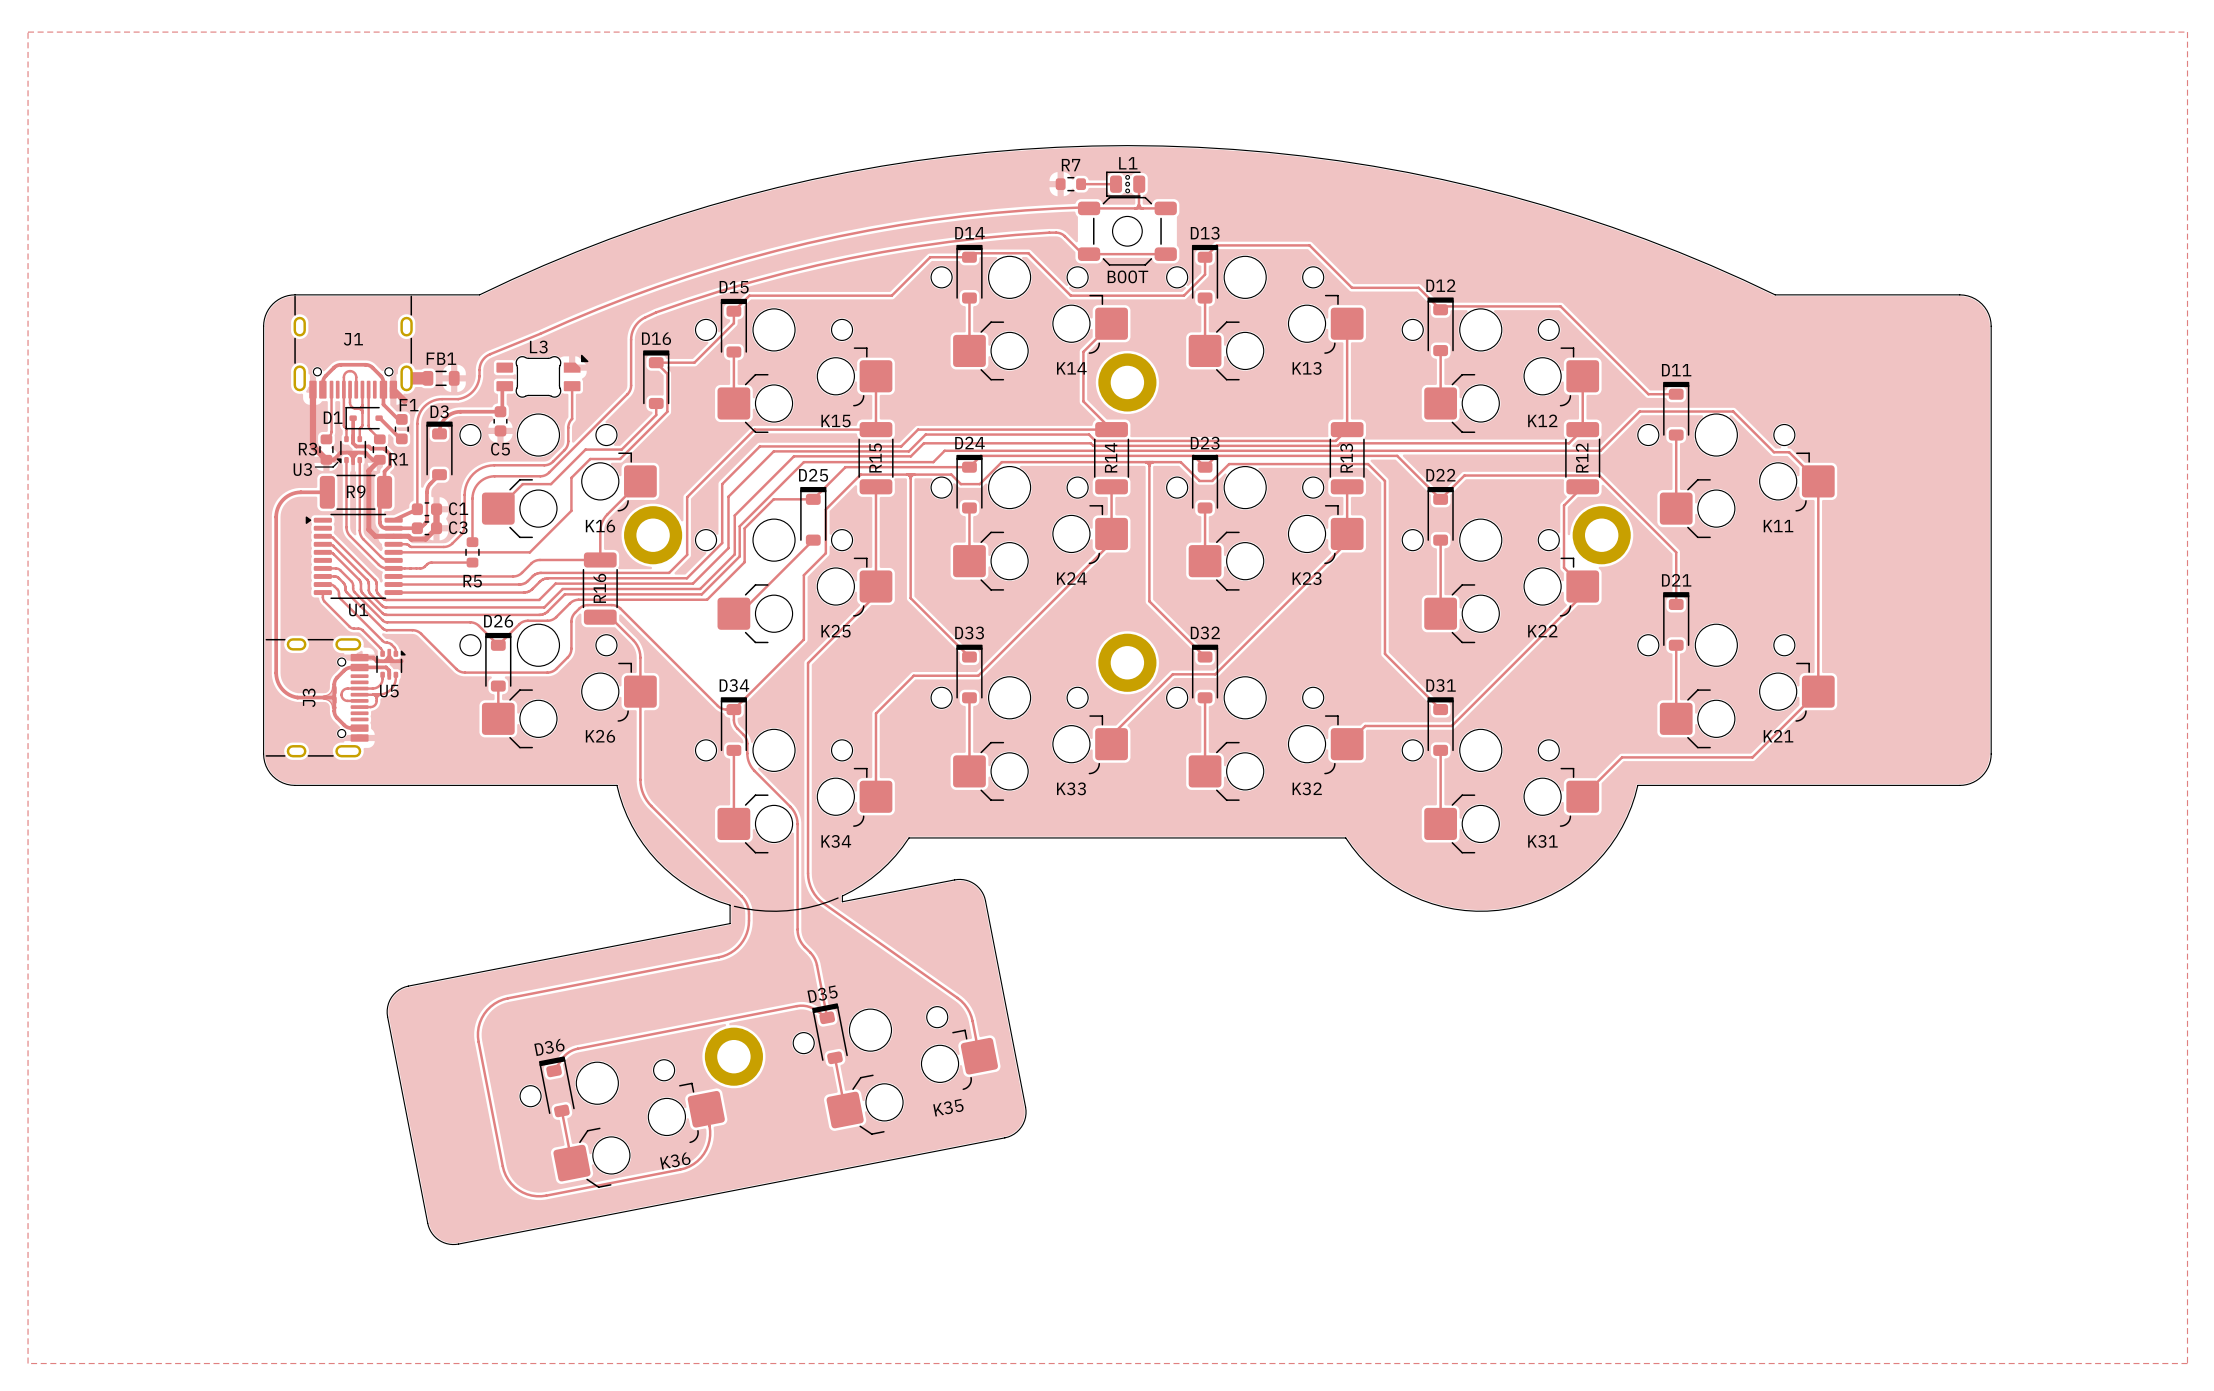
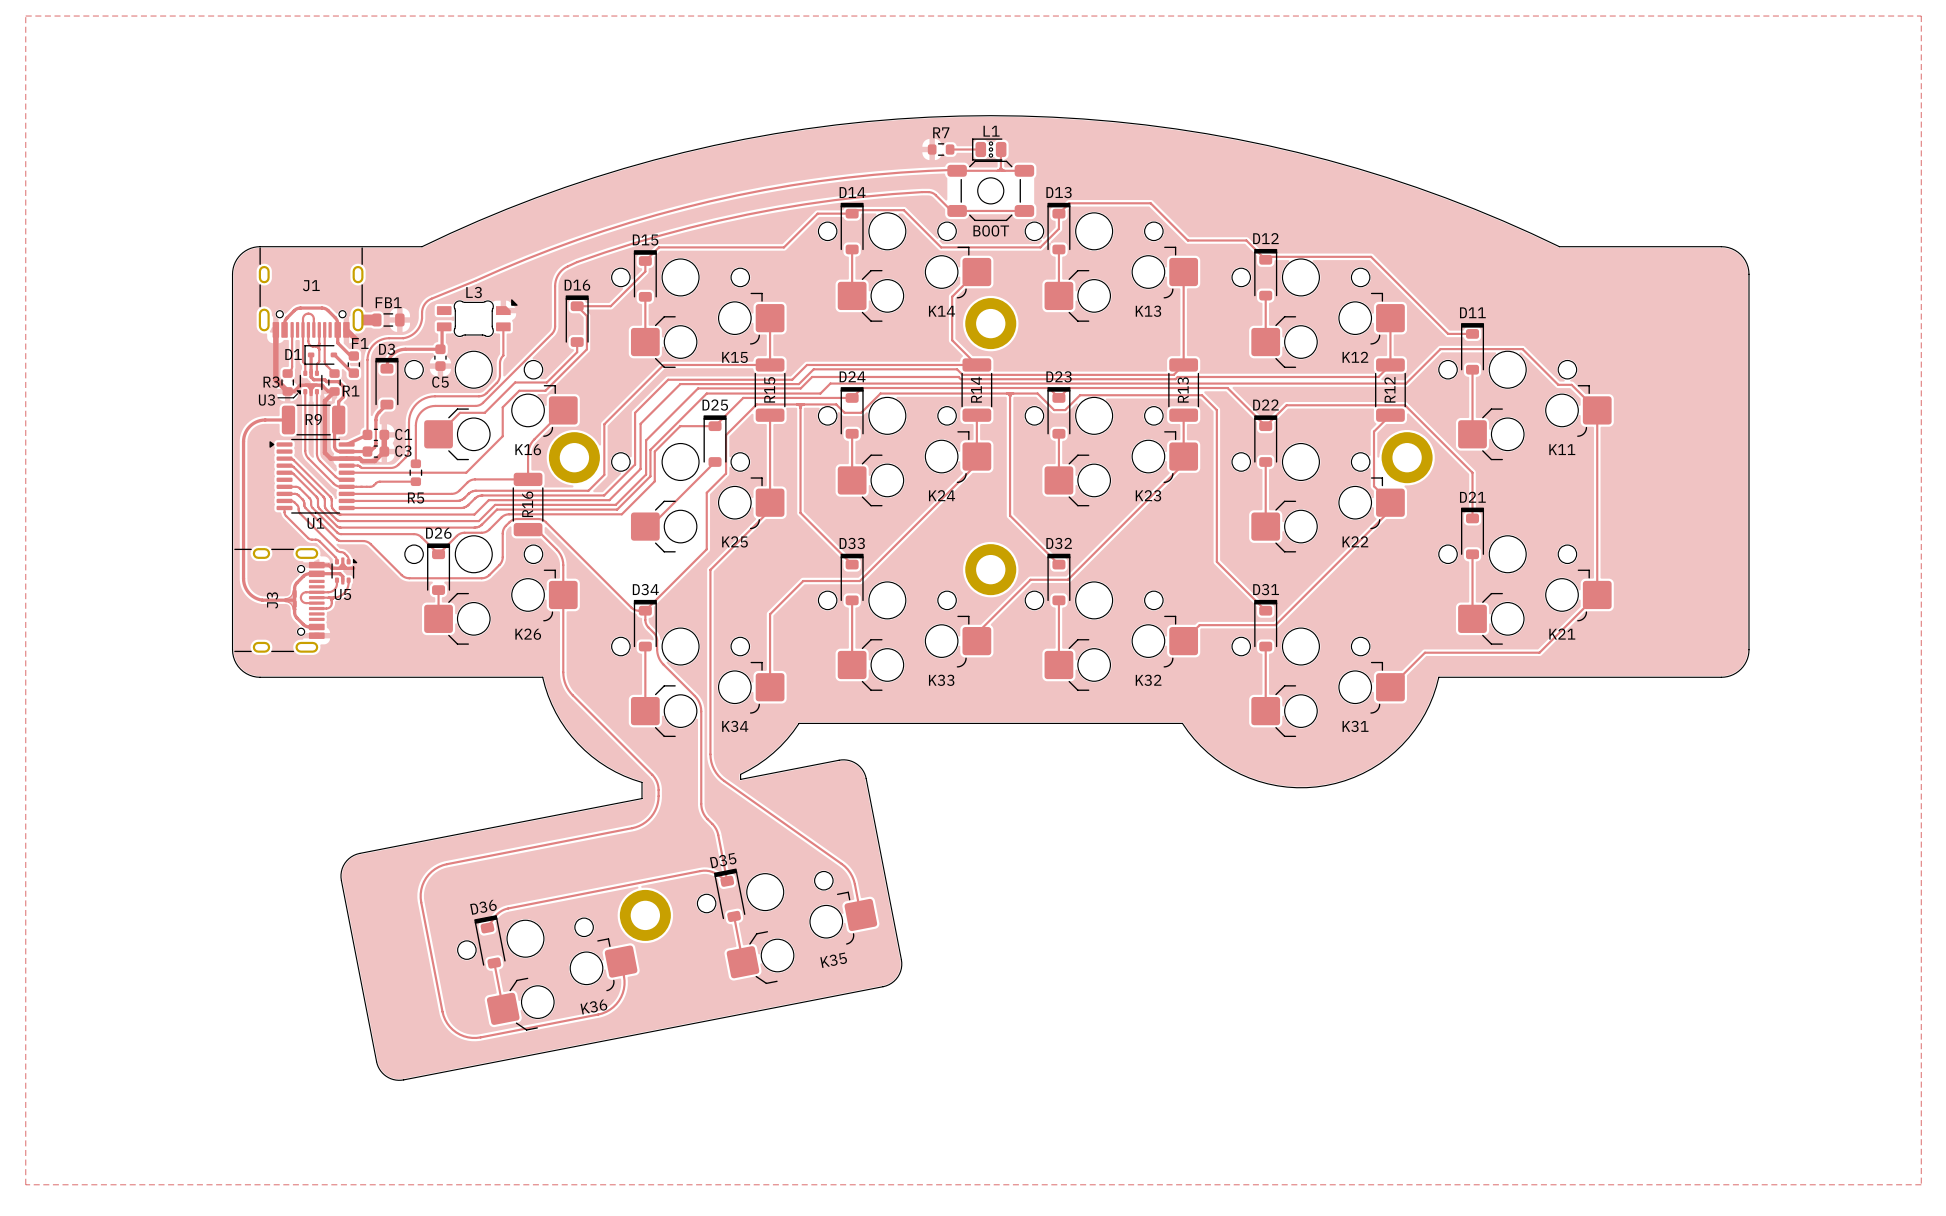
line: (838, 897) (818, 905) (786, 910) (755, 910) (734, 906) -> none

